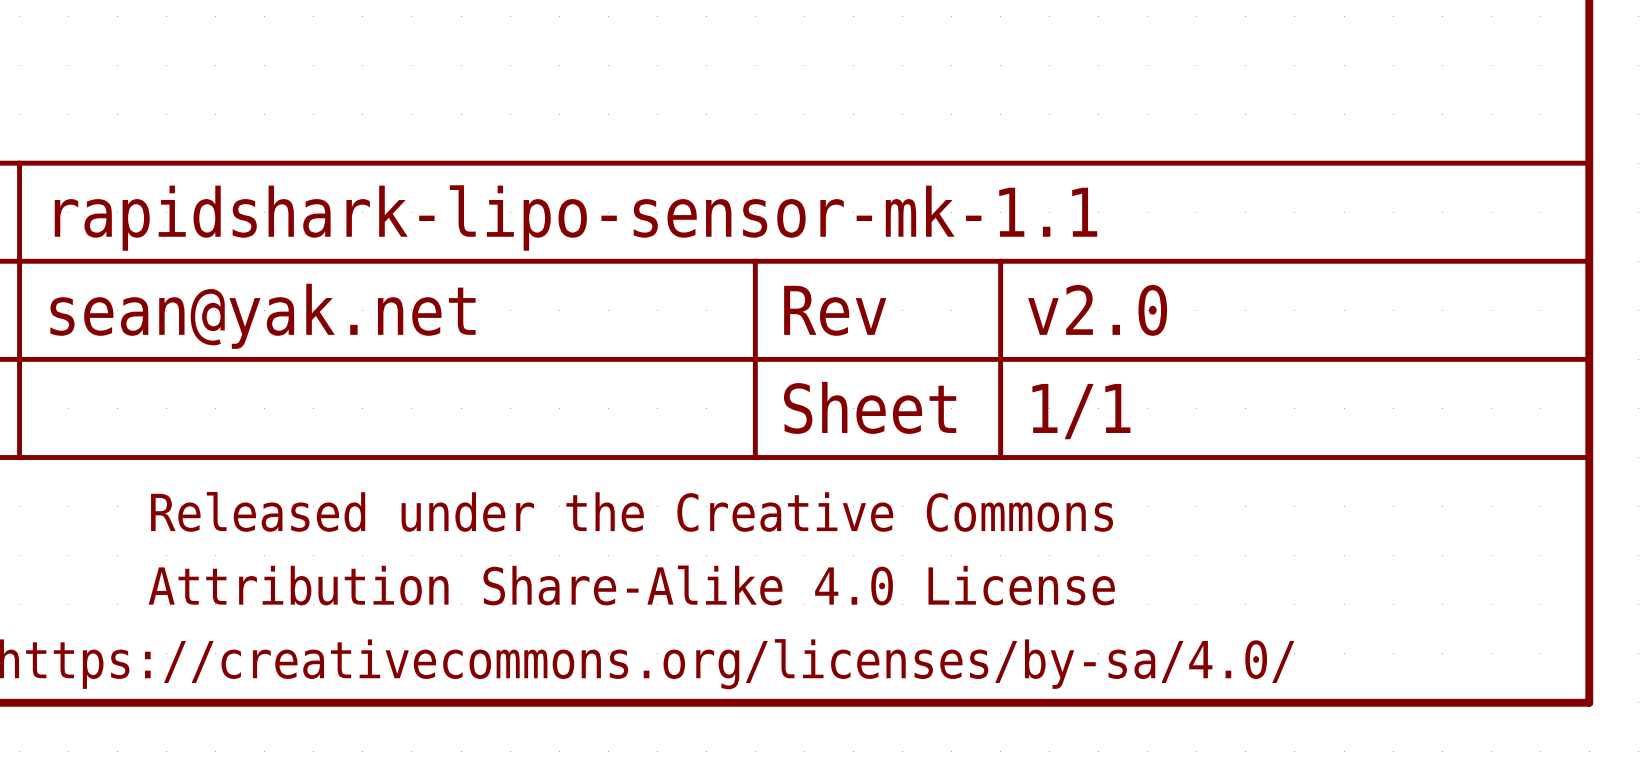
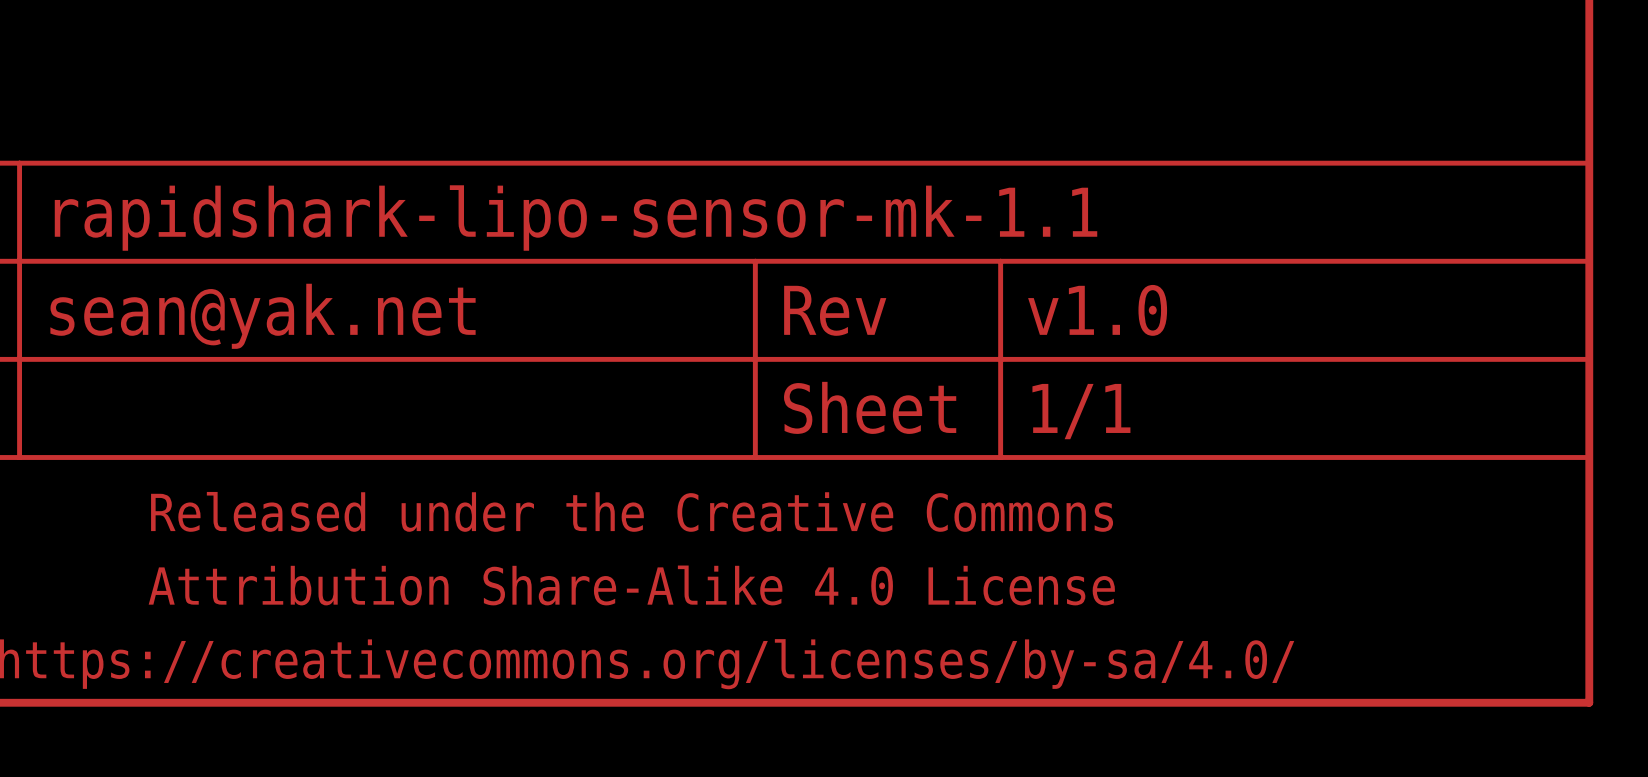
part text: v2.0 (1097, 310) -> v1.0 (1097, 310)

